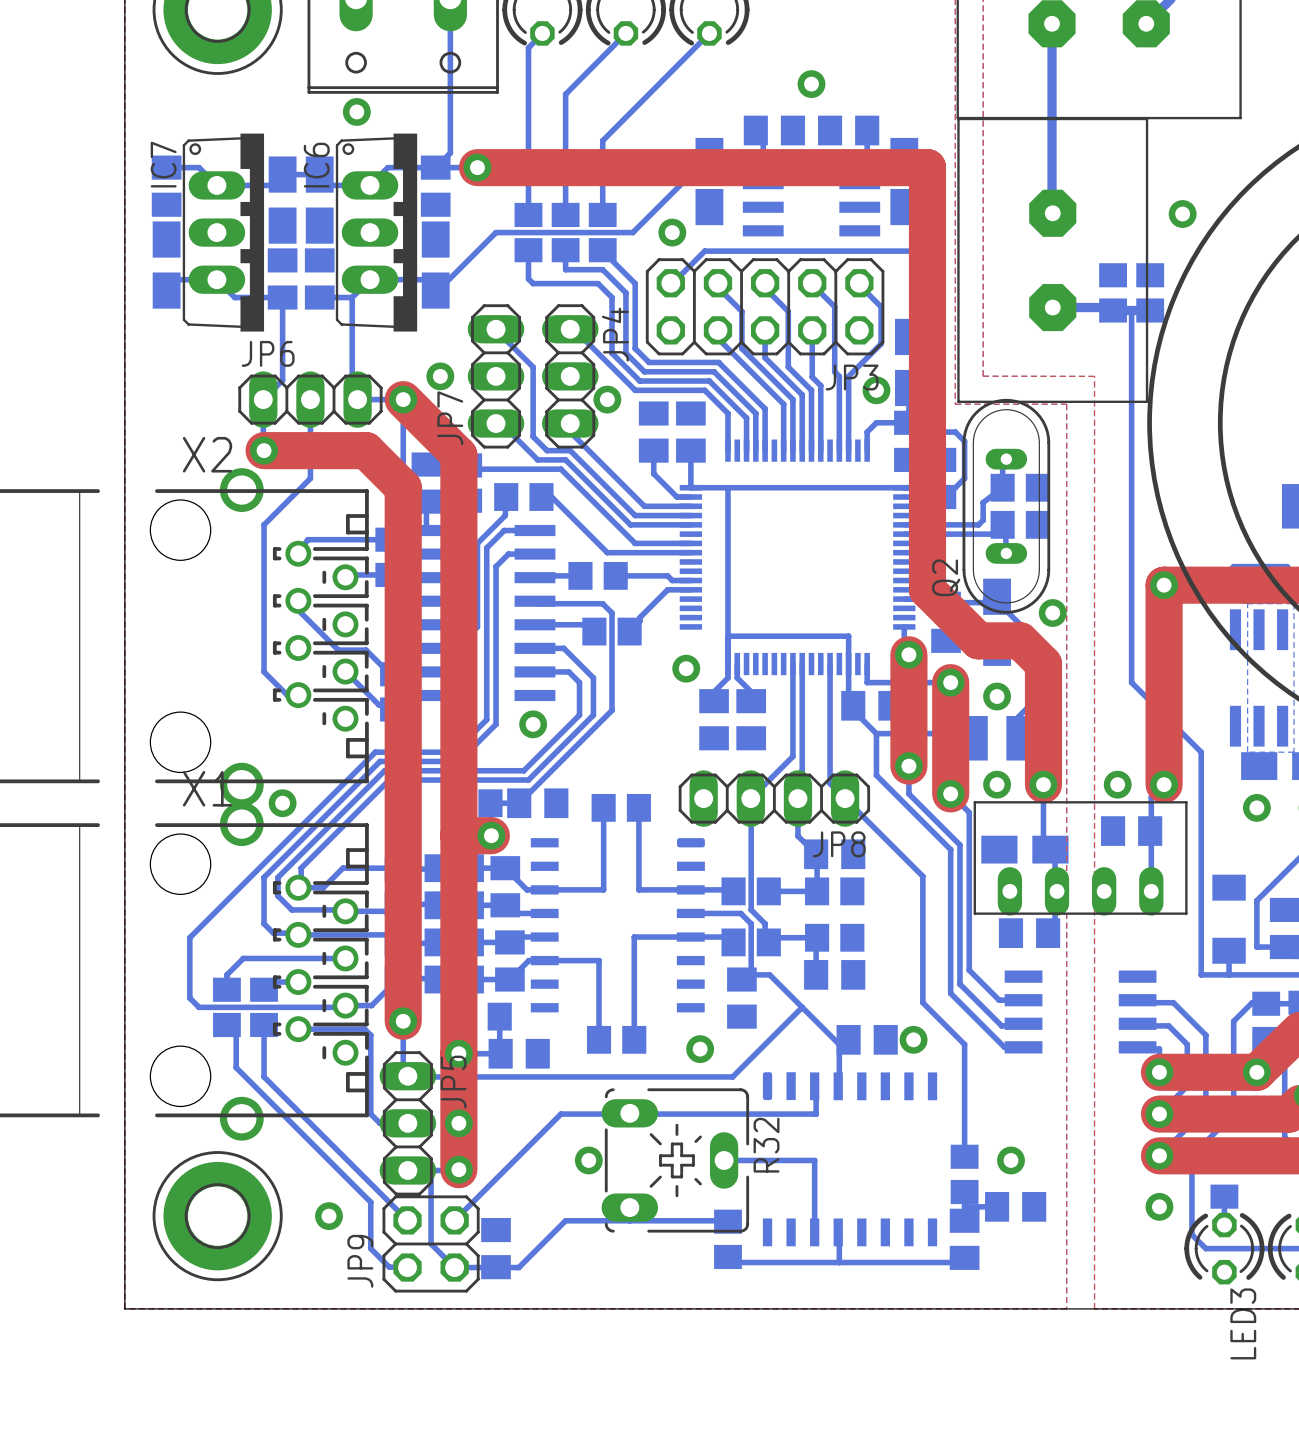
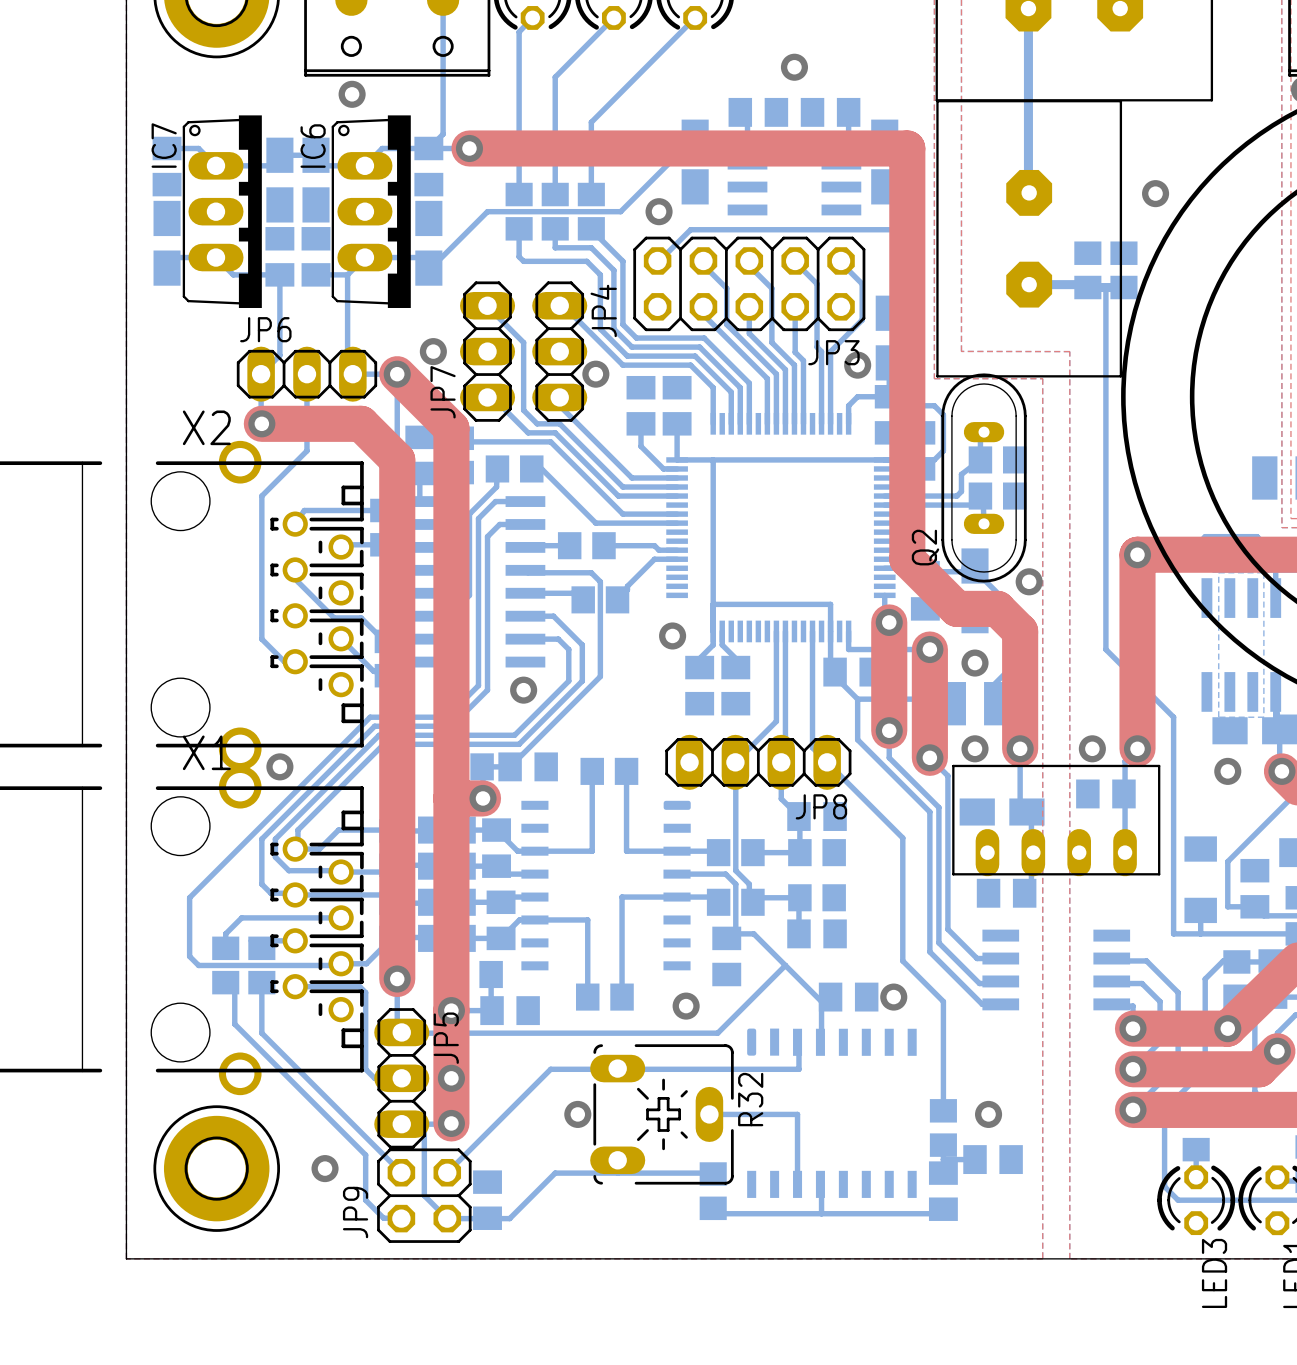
via: (1159, 1206) -> none

